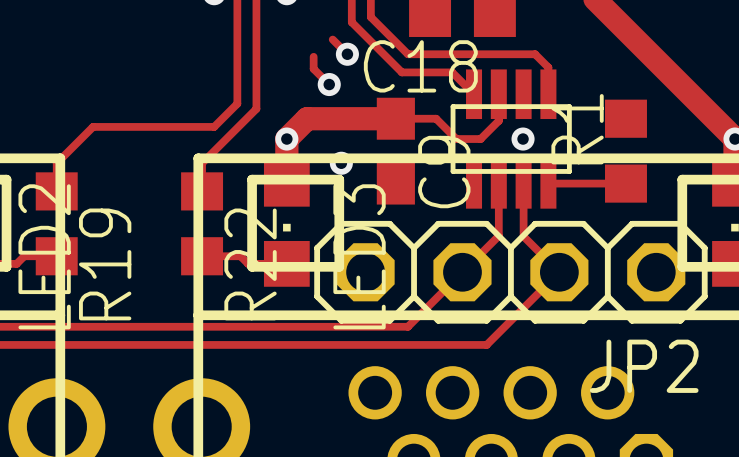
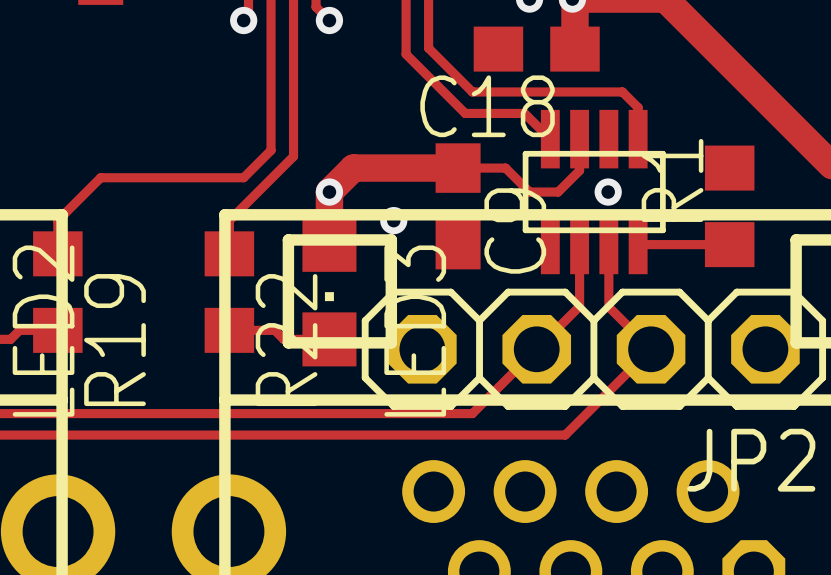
track: (332, 39) (347, 54) -> none
via: (347, 54) -> none
track: (313, 56) (313, 68) (329, 84) -> none
via: (329, 84) -> none

